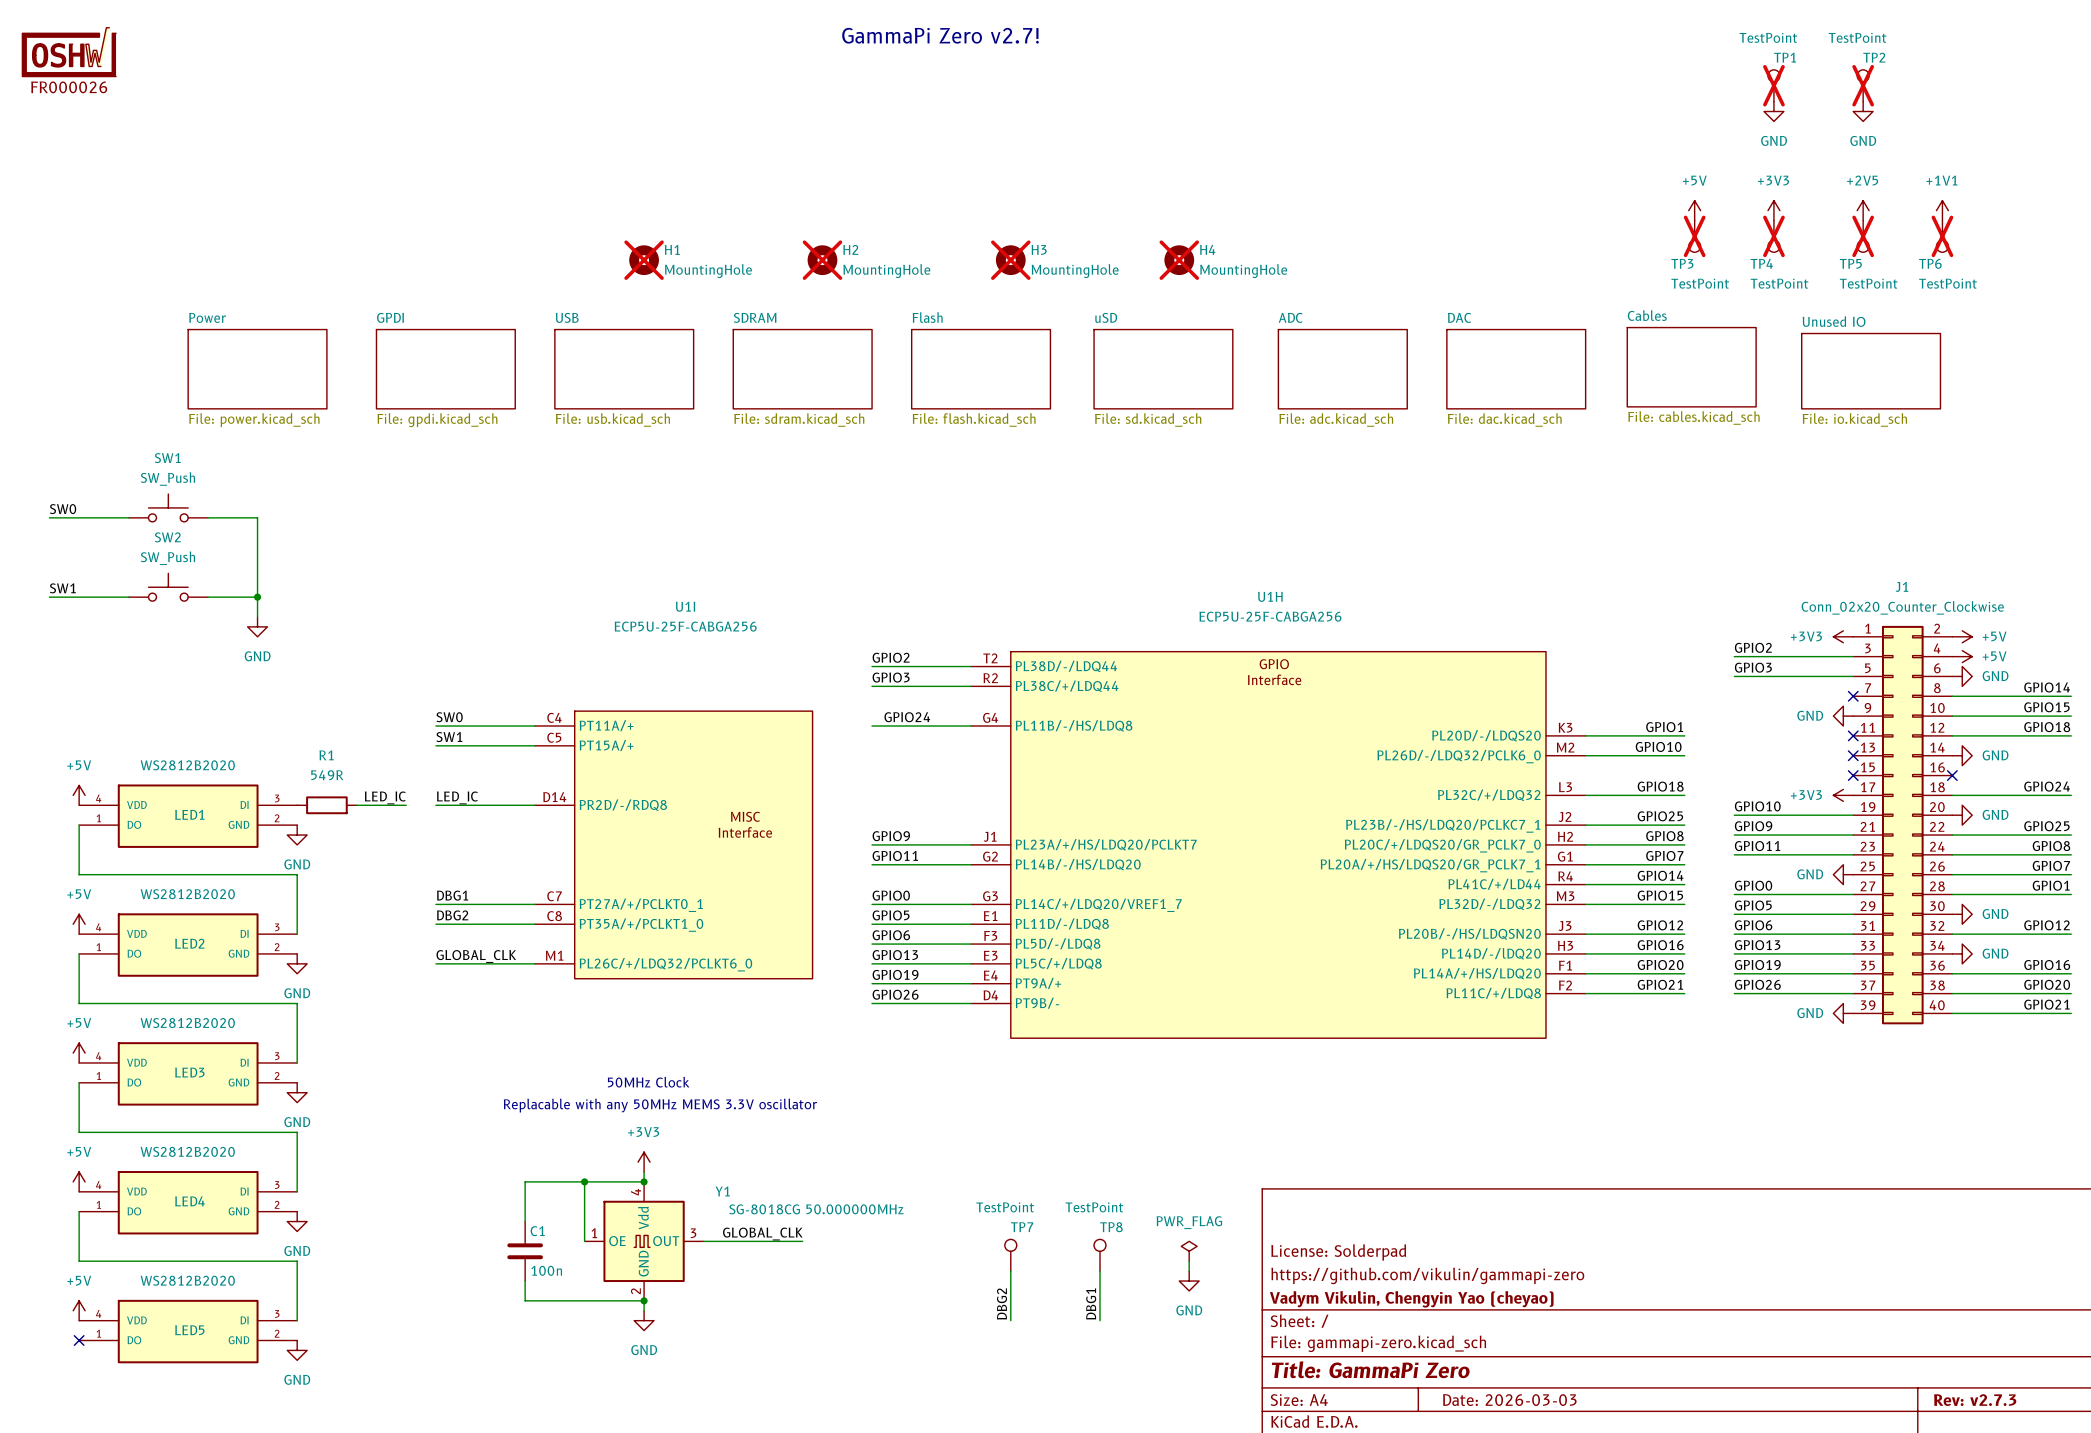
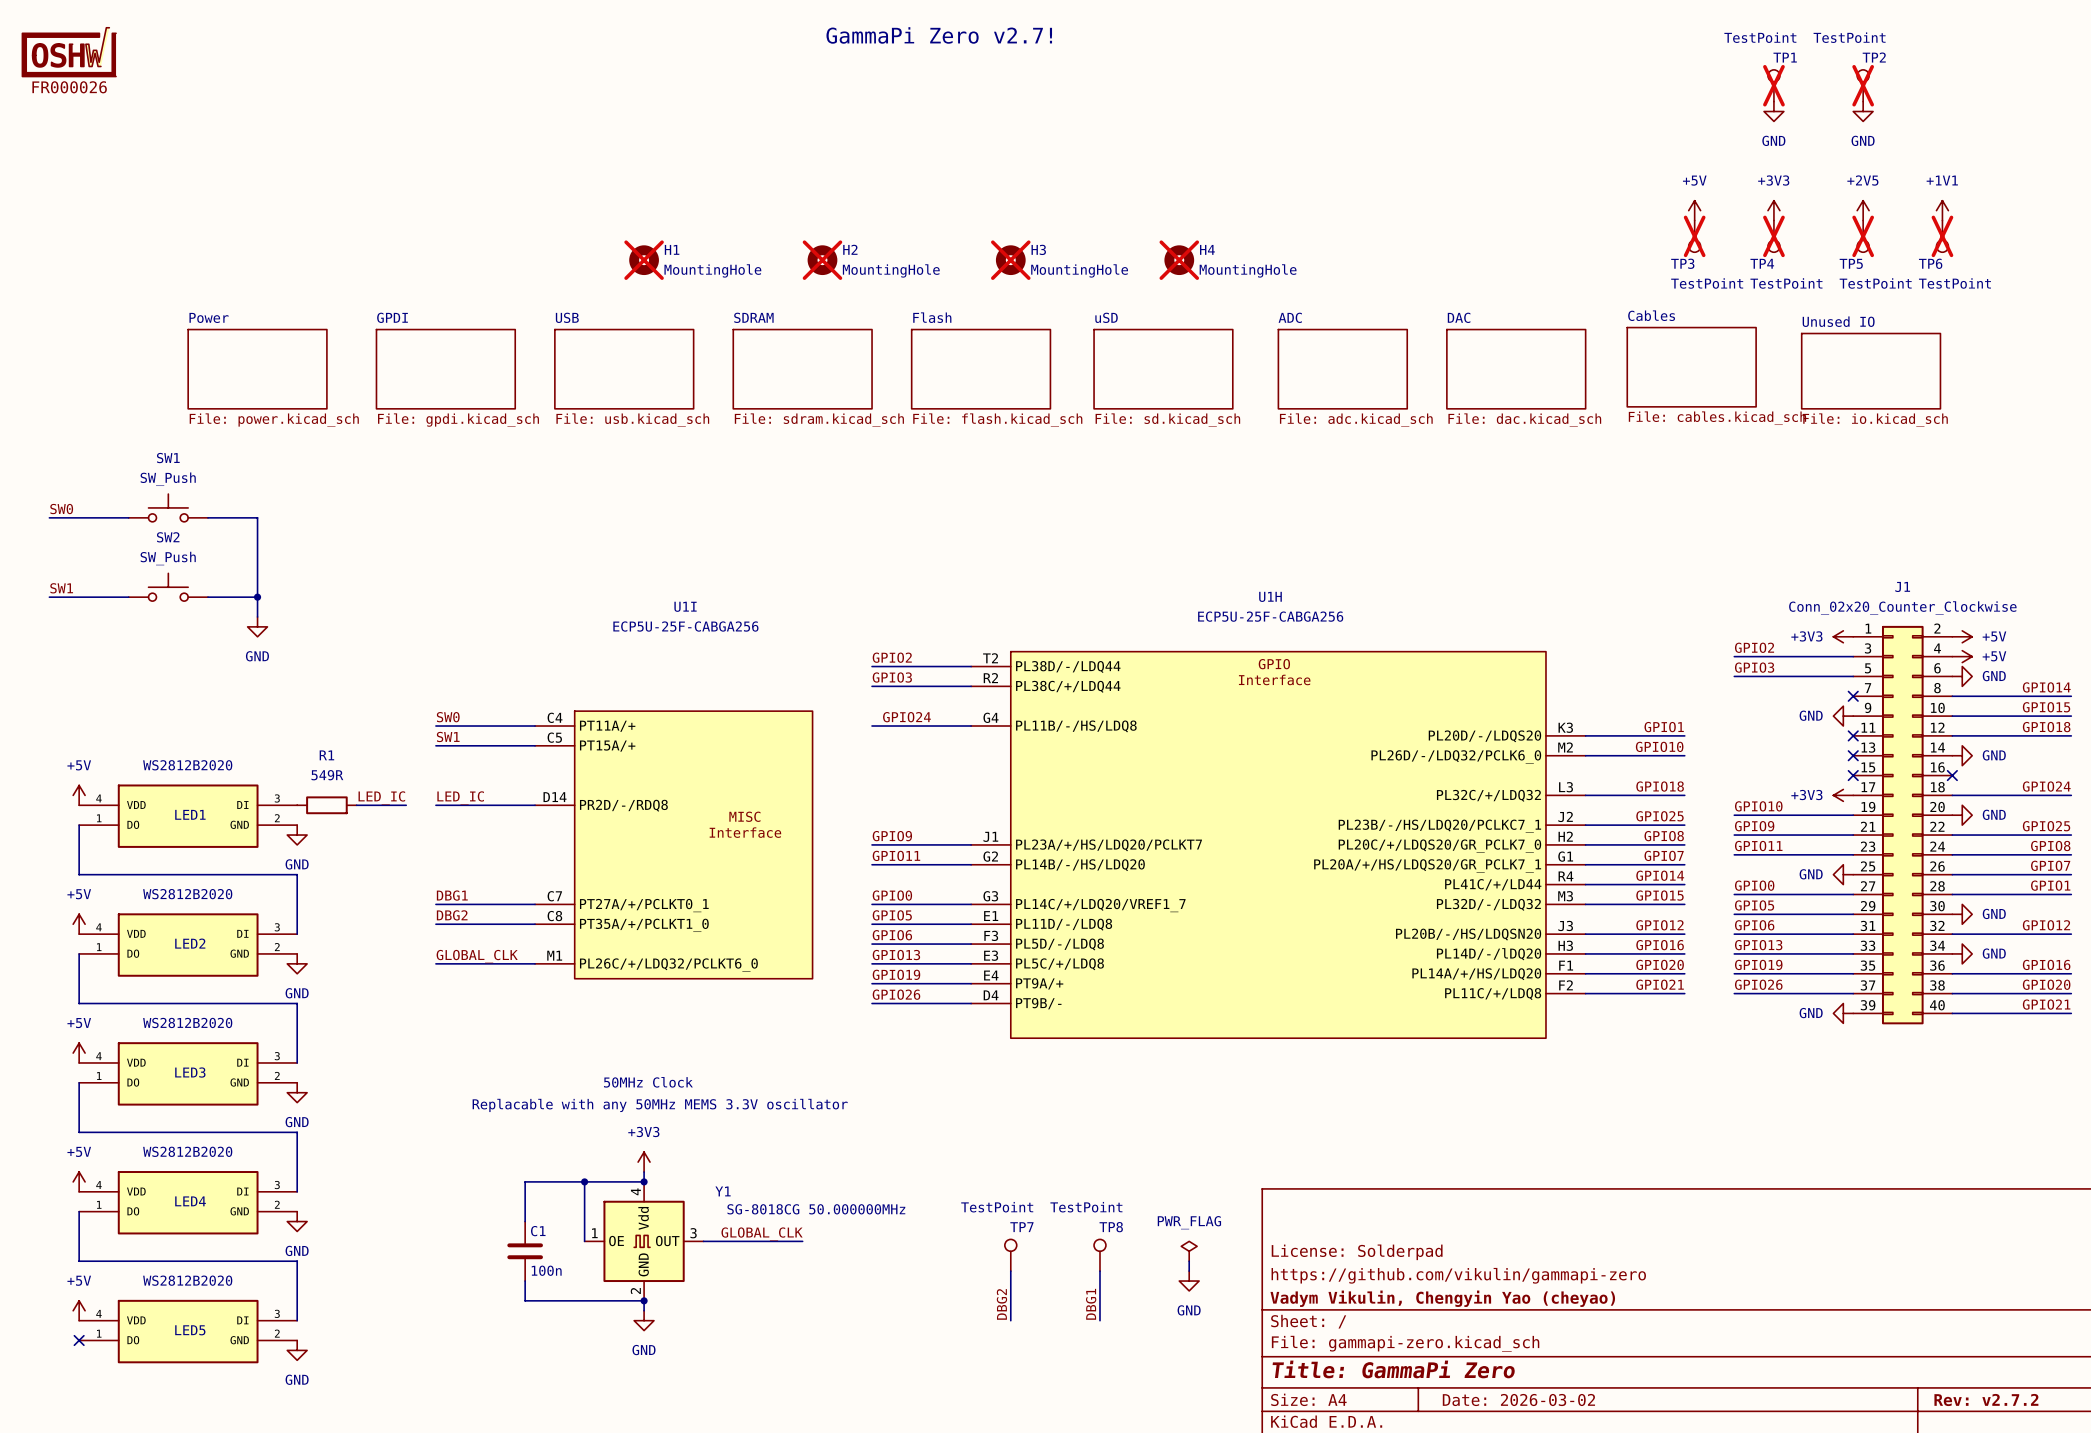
title block: Date: 2026-03-03 (1509, 1400) -> Date: 2026-03-02 (1518, 1400)
title block: Rev: v2.7.3 (1975, 1400) -> Rev: v2.7.2 (1986, 1400)

